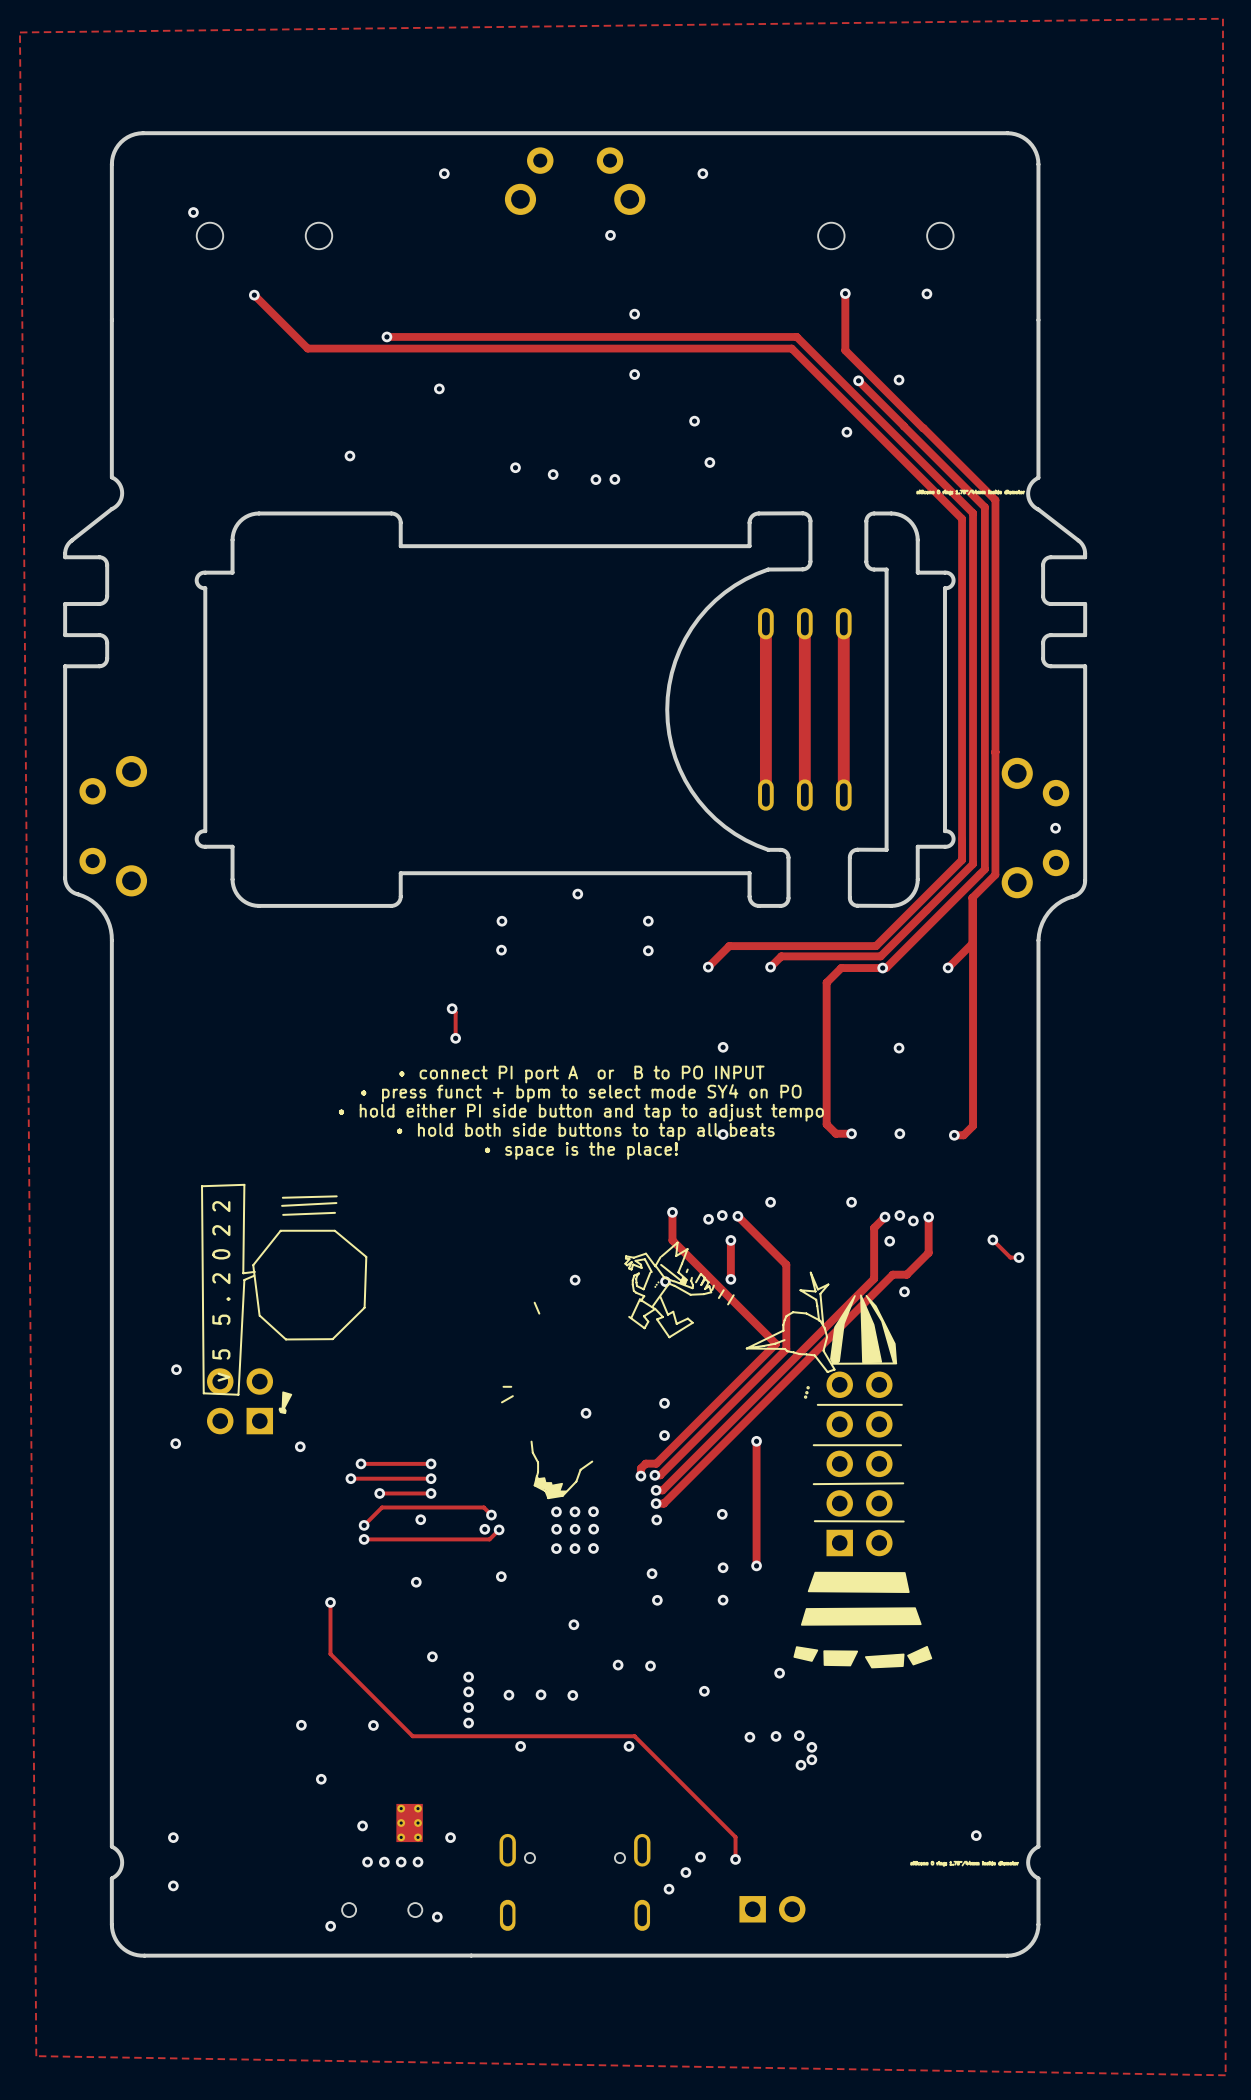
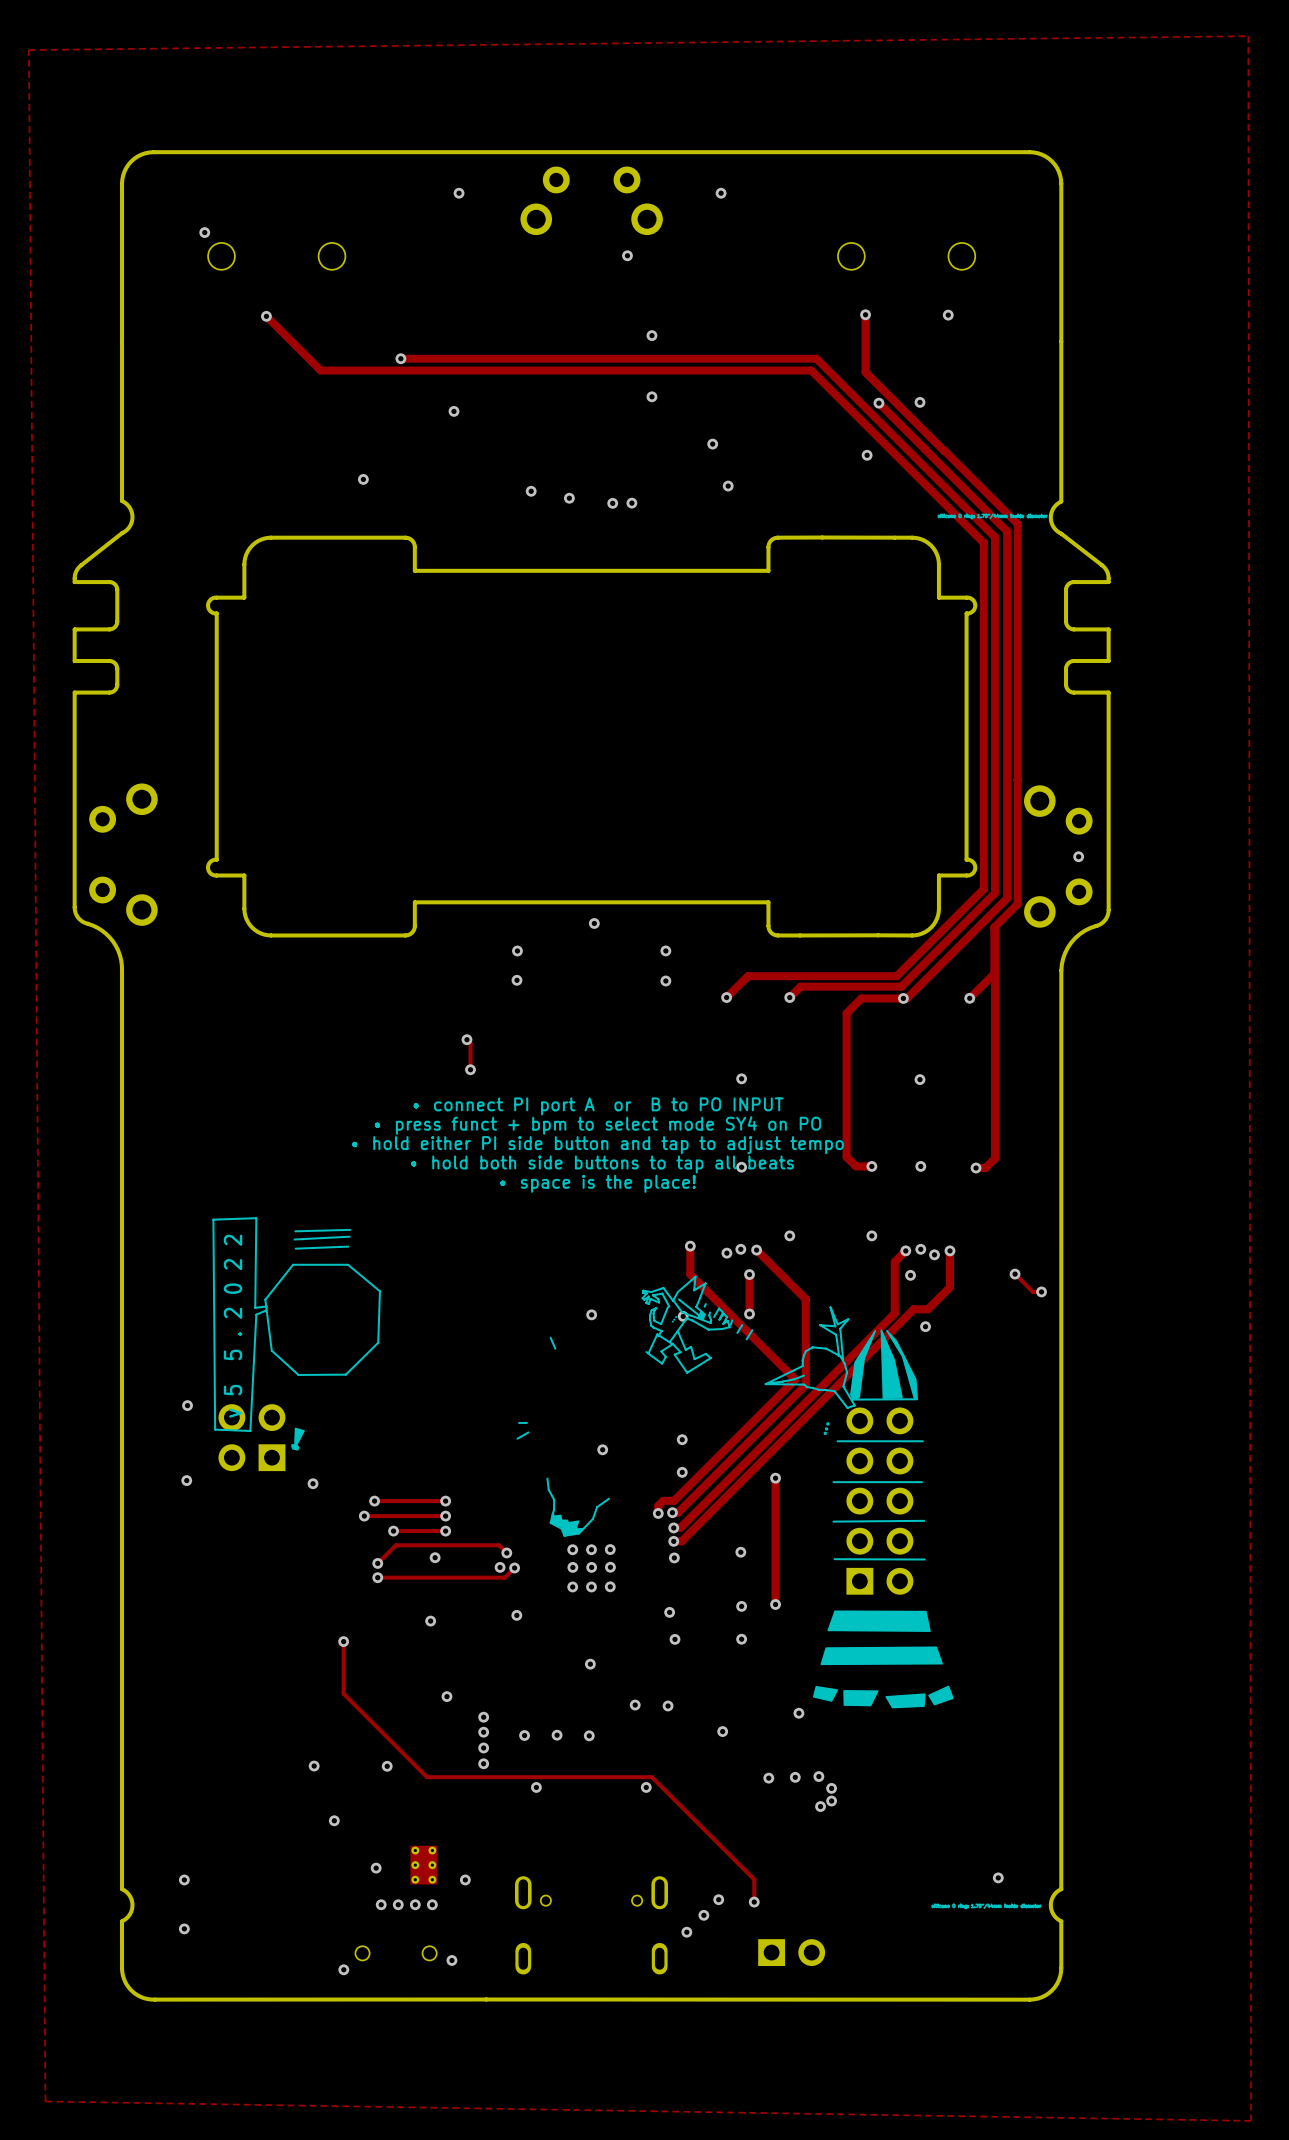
board edge: (802, 513) (807, 514) (810, 520) (808, 566) (803, 569) (768, 569) (735, 585) (715, 600) (691, 628) (679, 649) (671, 673) (667, 697) (669, 734) (675, 758) (685, 780) (698, 800) (715, 818) (735, 833) (768, 849) (782, 850) (787, 853) (788, 899) (785, 904) (780, 905) -> (878, 935) (800, 935)
board edge: (874, 513) (869, 515) (866, 520) (866, 563) (872, 569) (886, 569) (886, 849) (856, 849) (850, 853) (849, 898) (852, 904) (857, 905) -> (894, 537) (822, 537)
track: (804, 620) (804, 793) -> none
track: (843, 620) (843, 793) -> none
track: (765, 622) (765, 795) -> none
part: (804, 623) -> none
part: (804, 795) -> none

